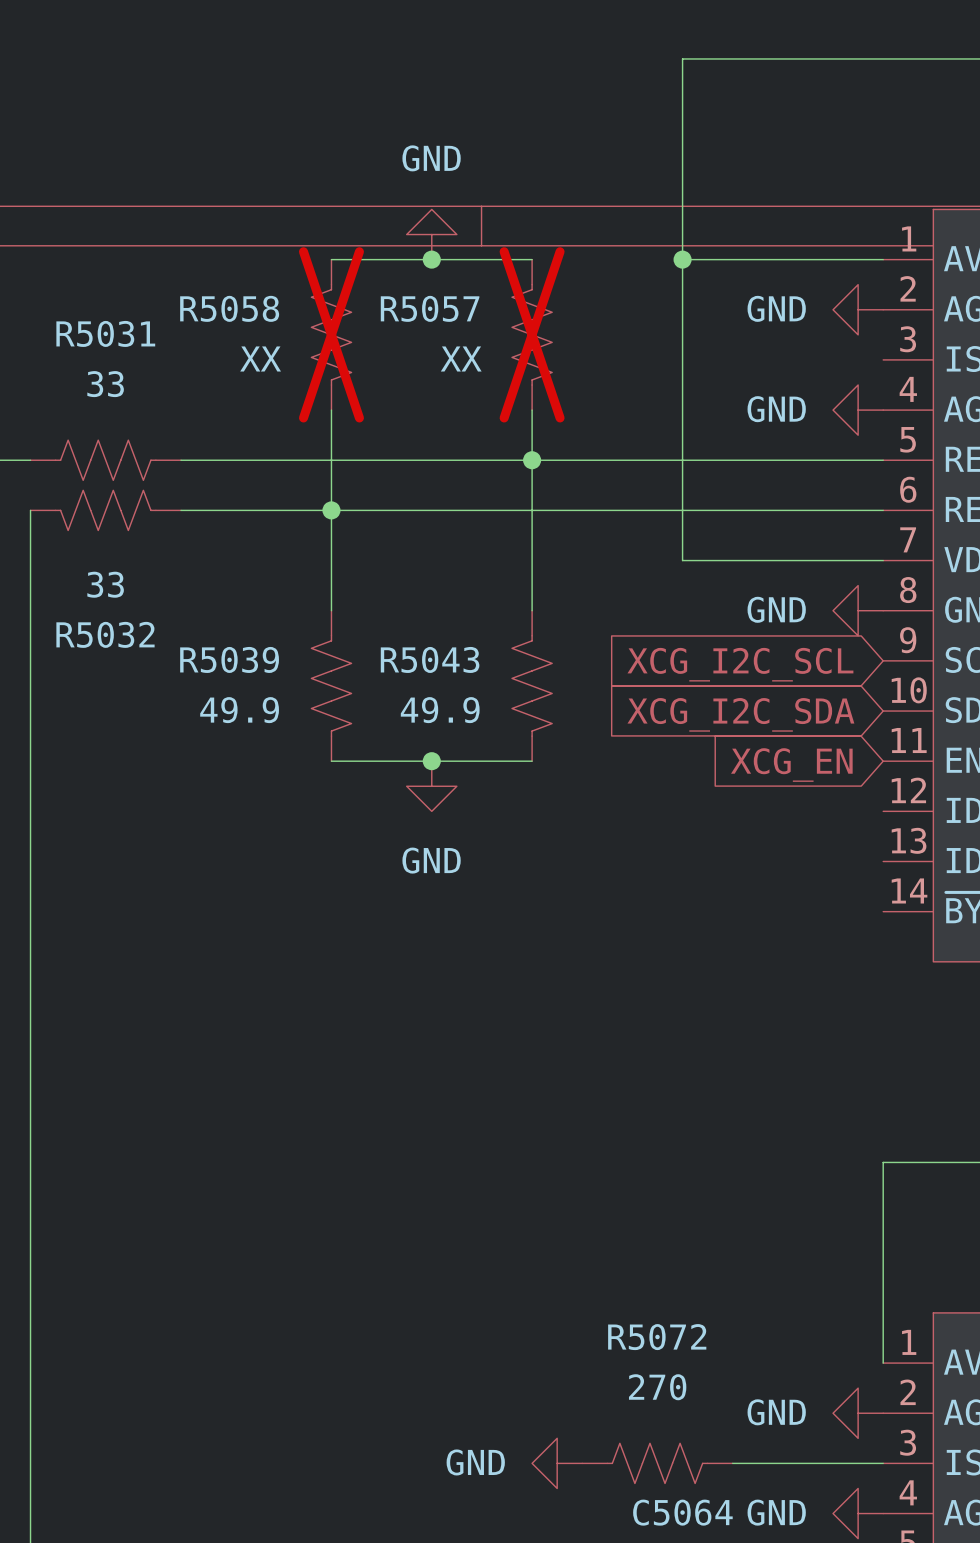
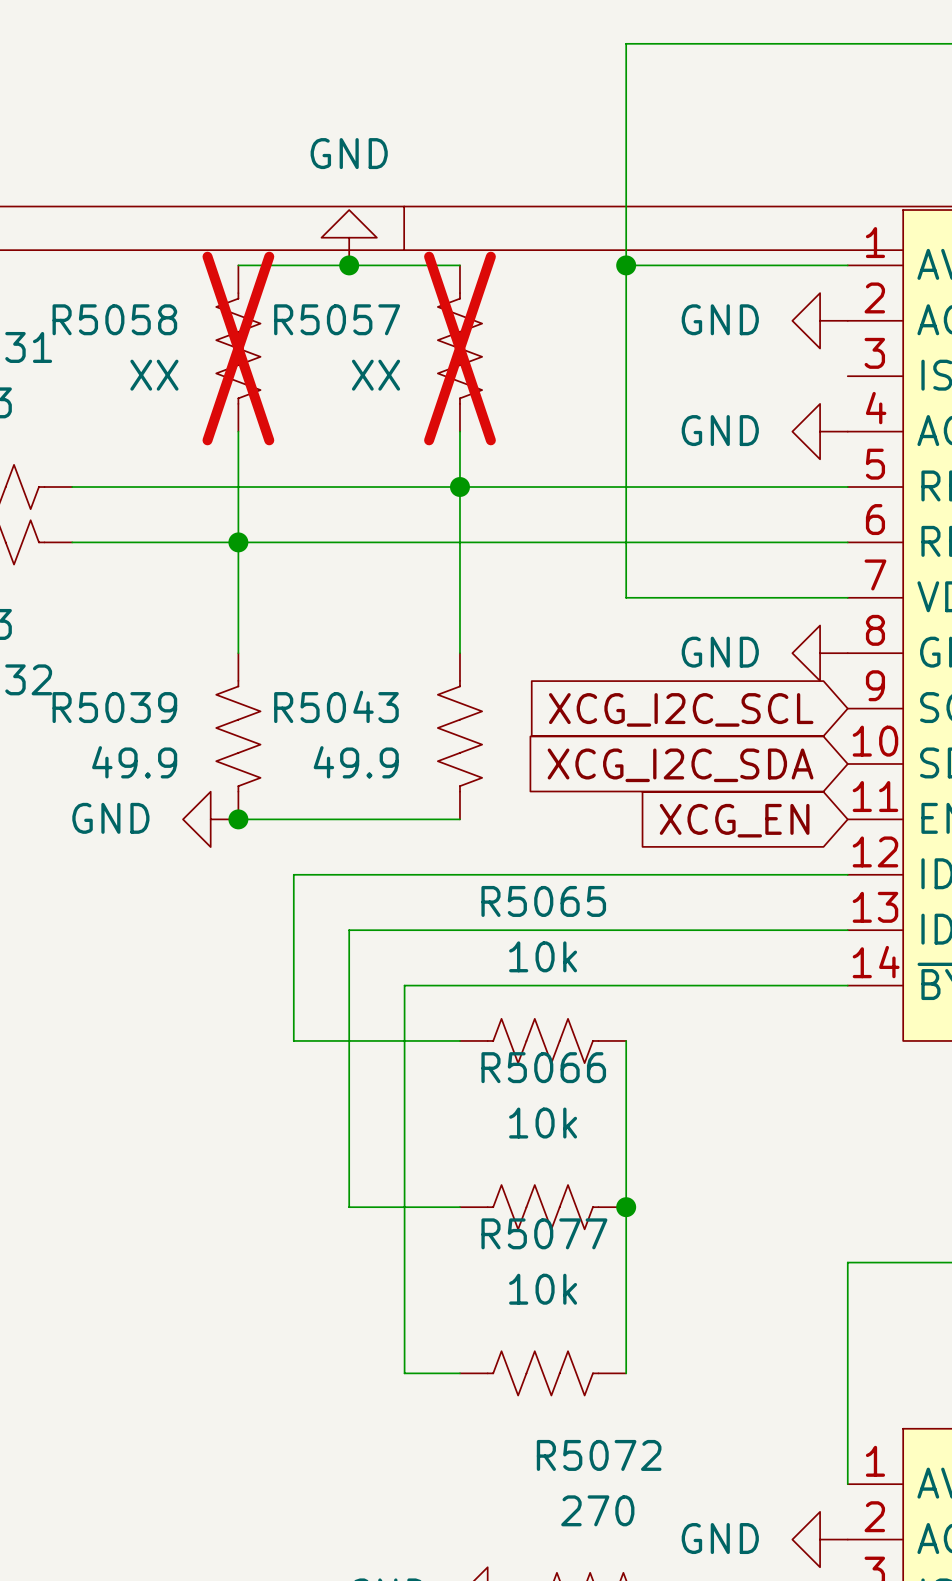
junction position: (431, 761) -> (238, 819)
power symbol rotation: 0° (431, 786) -> 90° clockwise (210, 819)
power symbol position: GND (431, 786) -> GND (210, 819)
wire: none -> (847, 874) (293, 874) (293, 1040) (459, 1040)
wire: none -> (847, 930) (349, 930) (349, 1207) (459, 1207)
wire: none -> (847, 985) (404, 985) (404, 1373) (459, 1373)
R5065: none -> 10k (543, 1040)
wire: none -> (626, 1040) (626, 1373)
R5066: none -> 10k (543, 1207)
junction: none -> (626, 1207)
R5077: none -> 10k (543, 1373)

